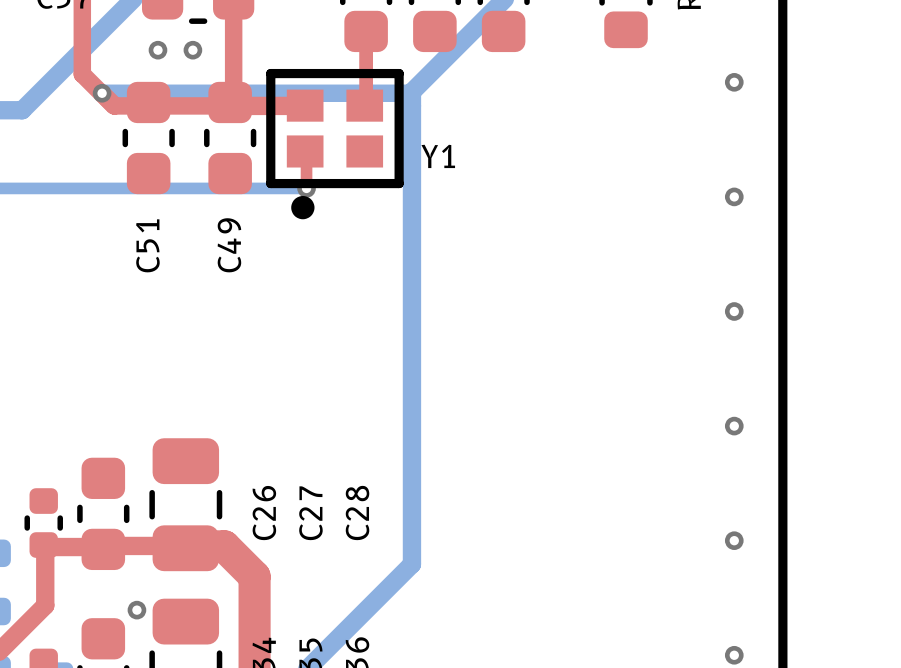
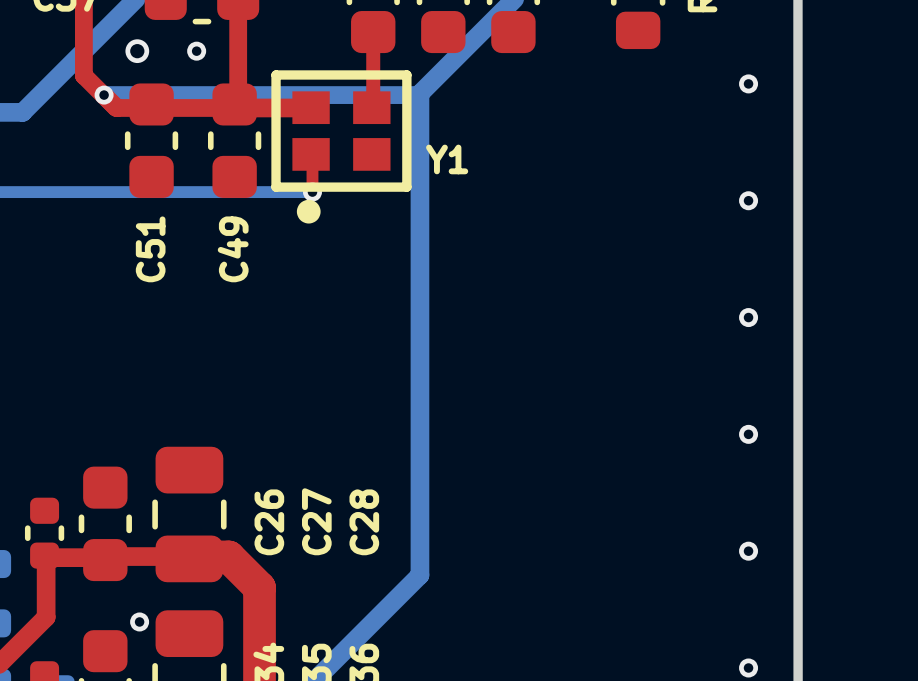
via: none -> (137, 51)
via: (157, 50) -> none

